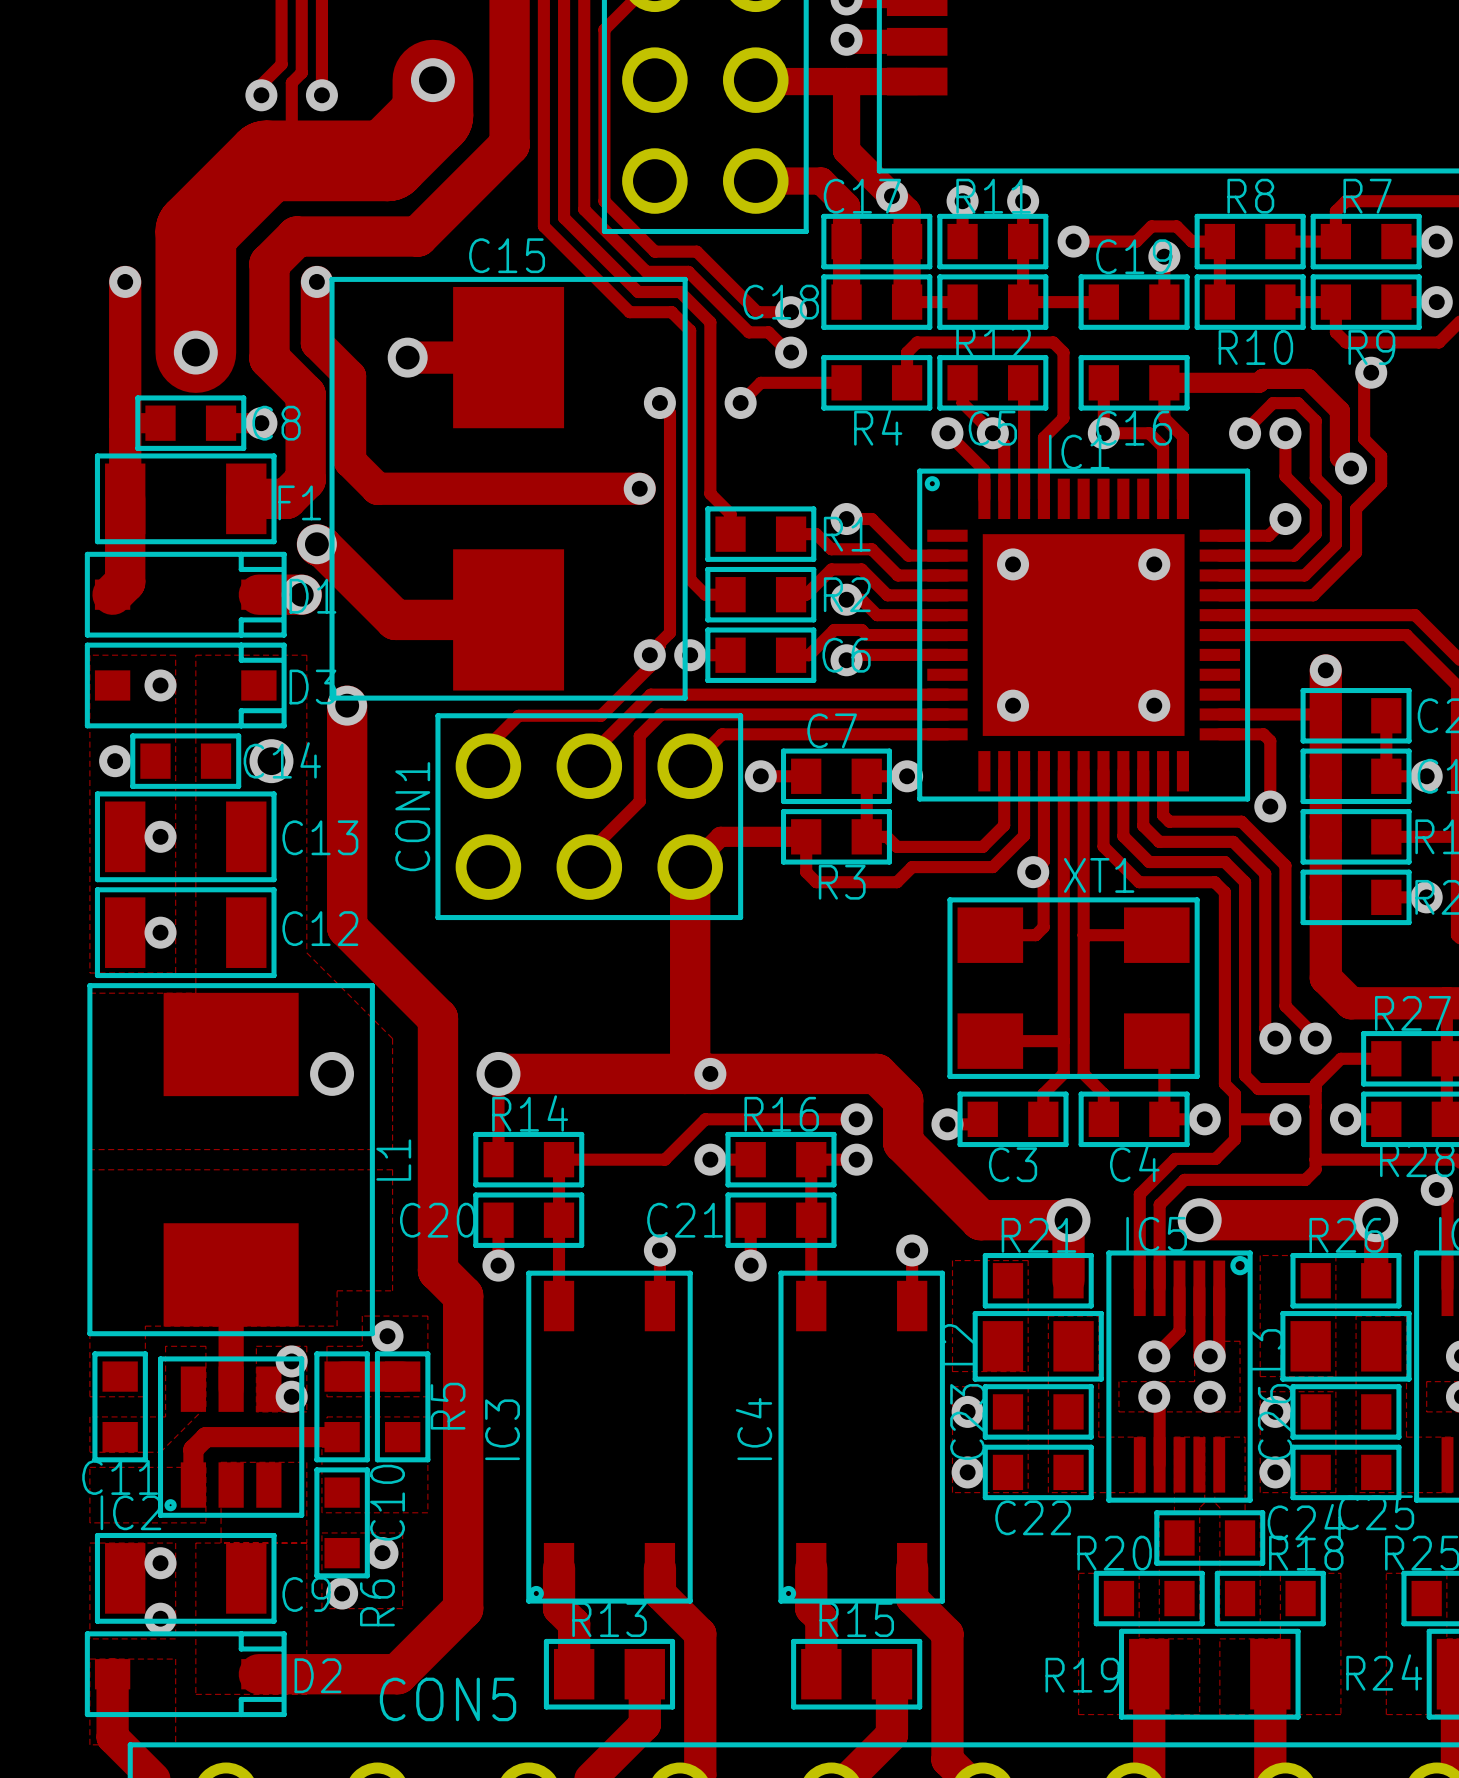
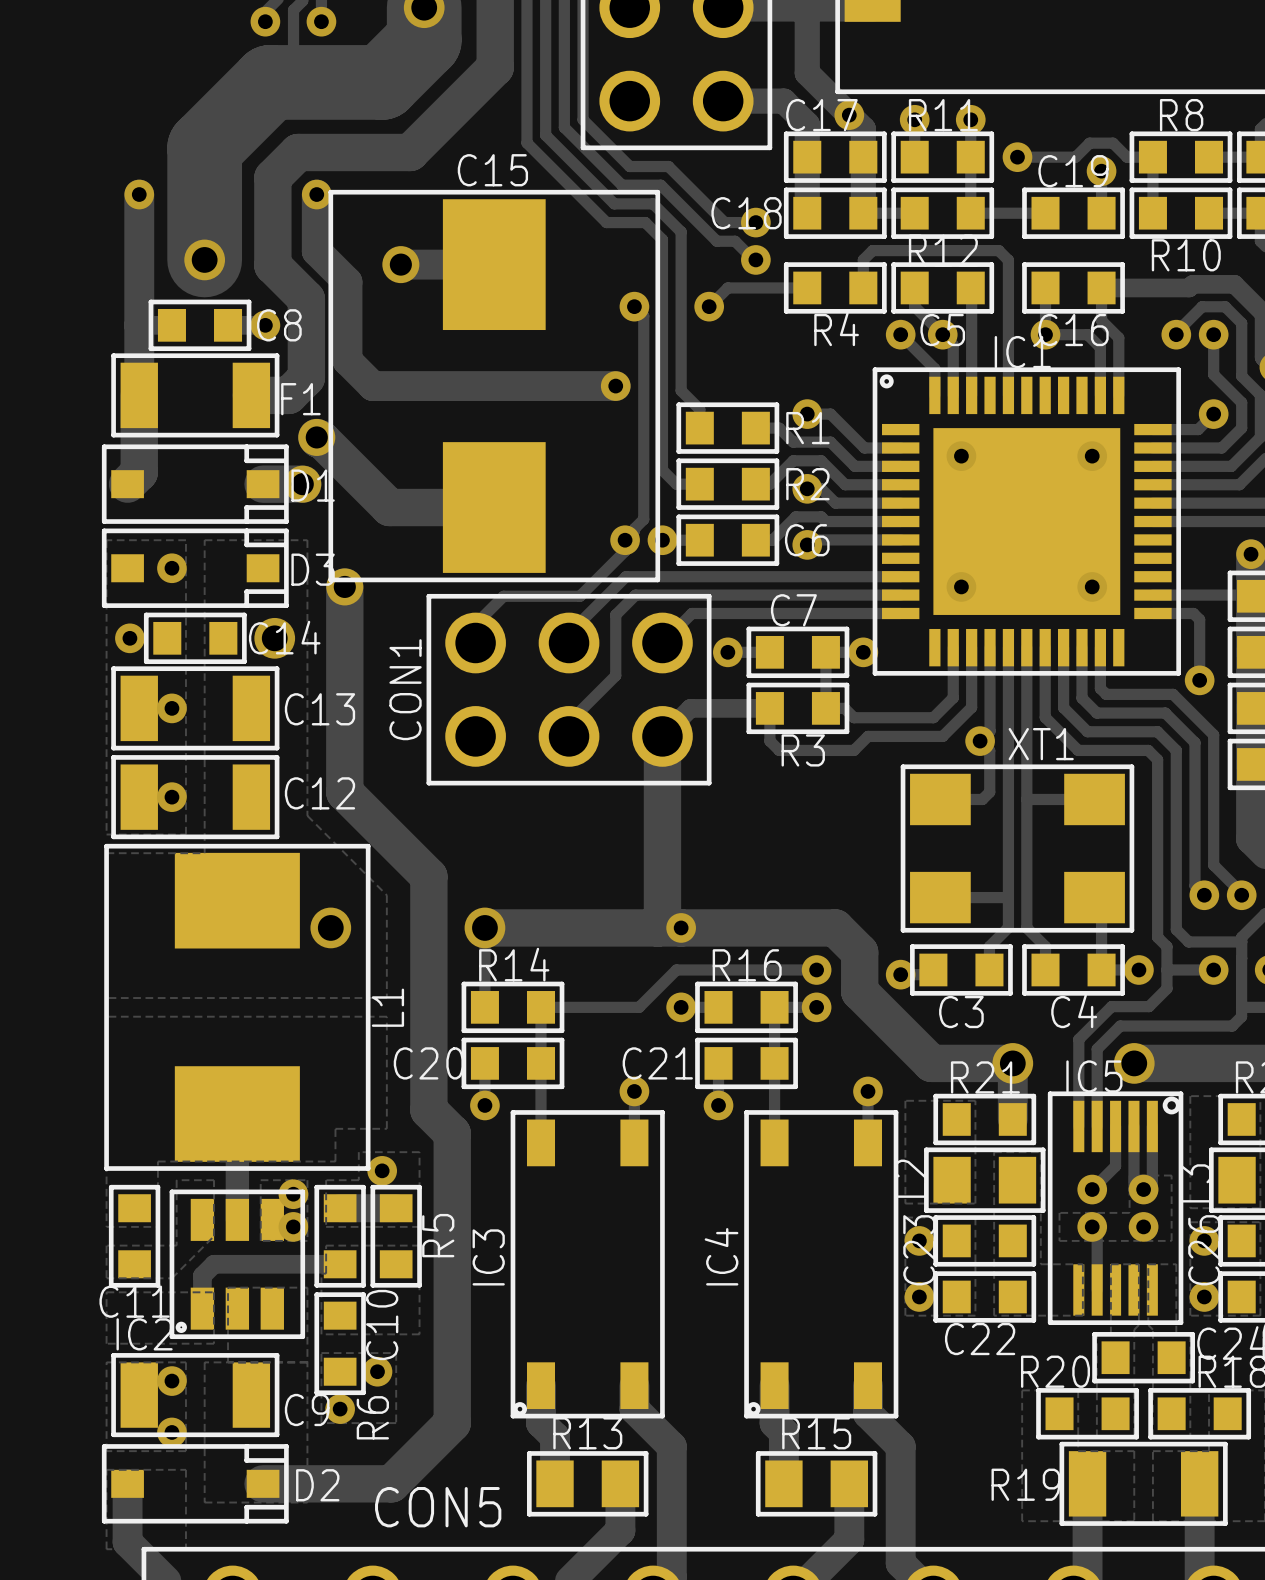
track: (1063, 352) (1063, 418) (1043, 437) (1043, 498) -> (1008, 260) (1008, 395)

